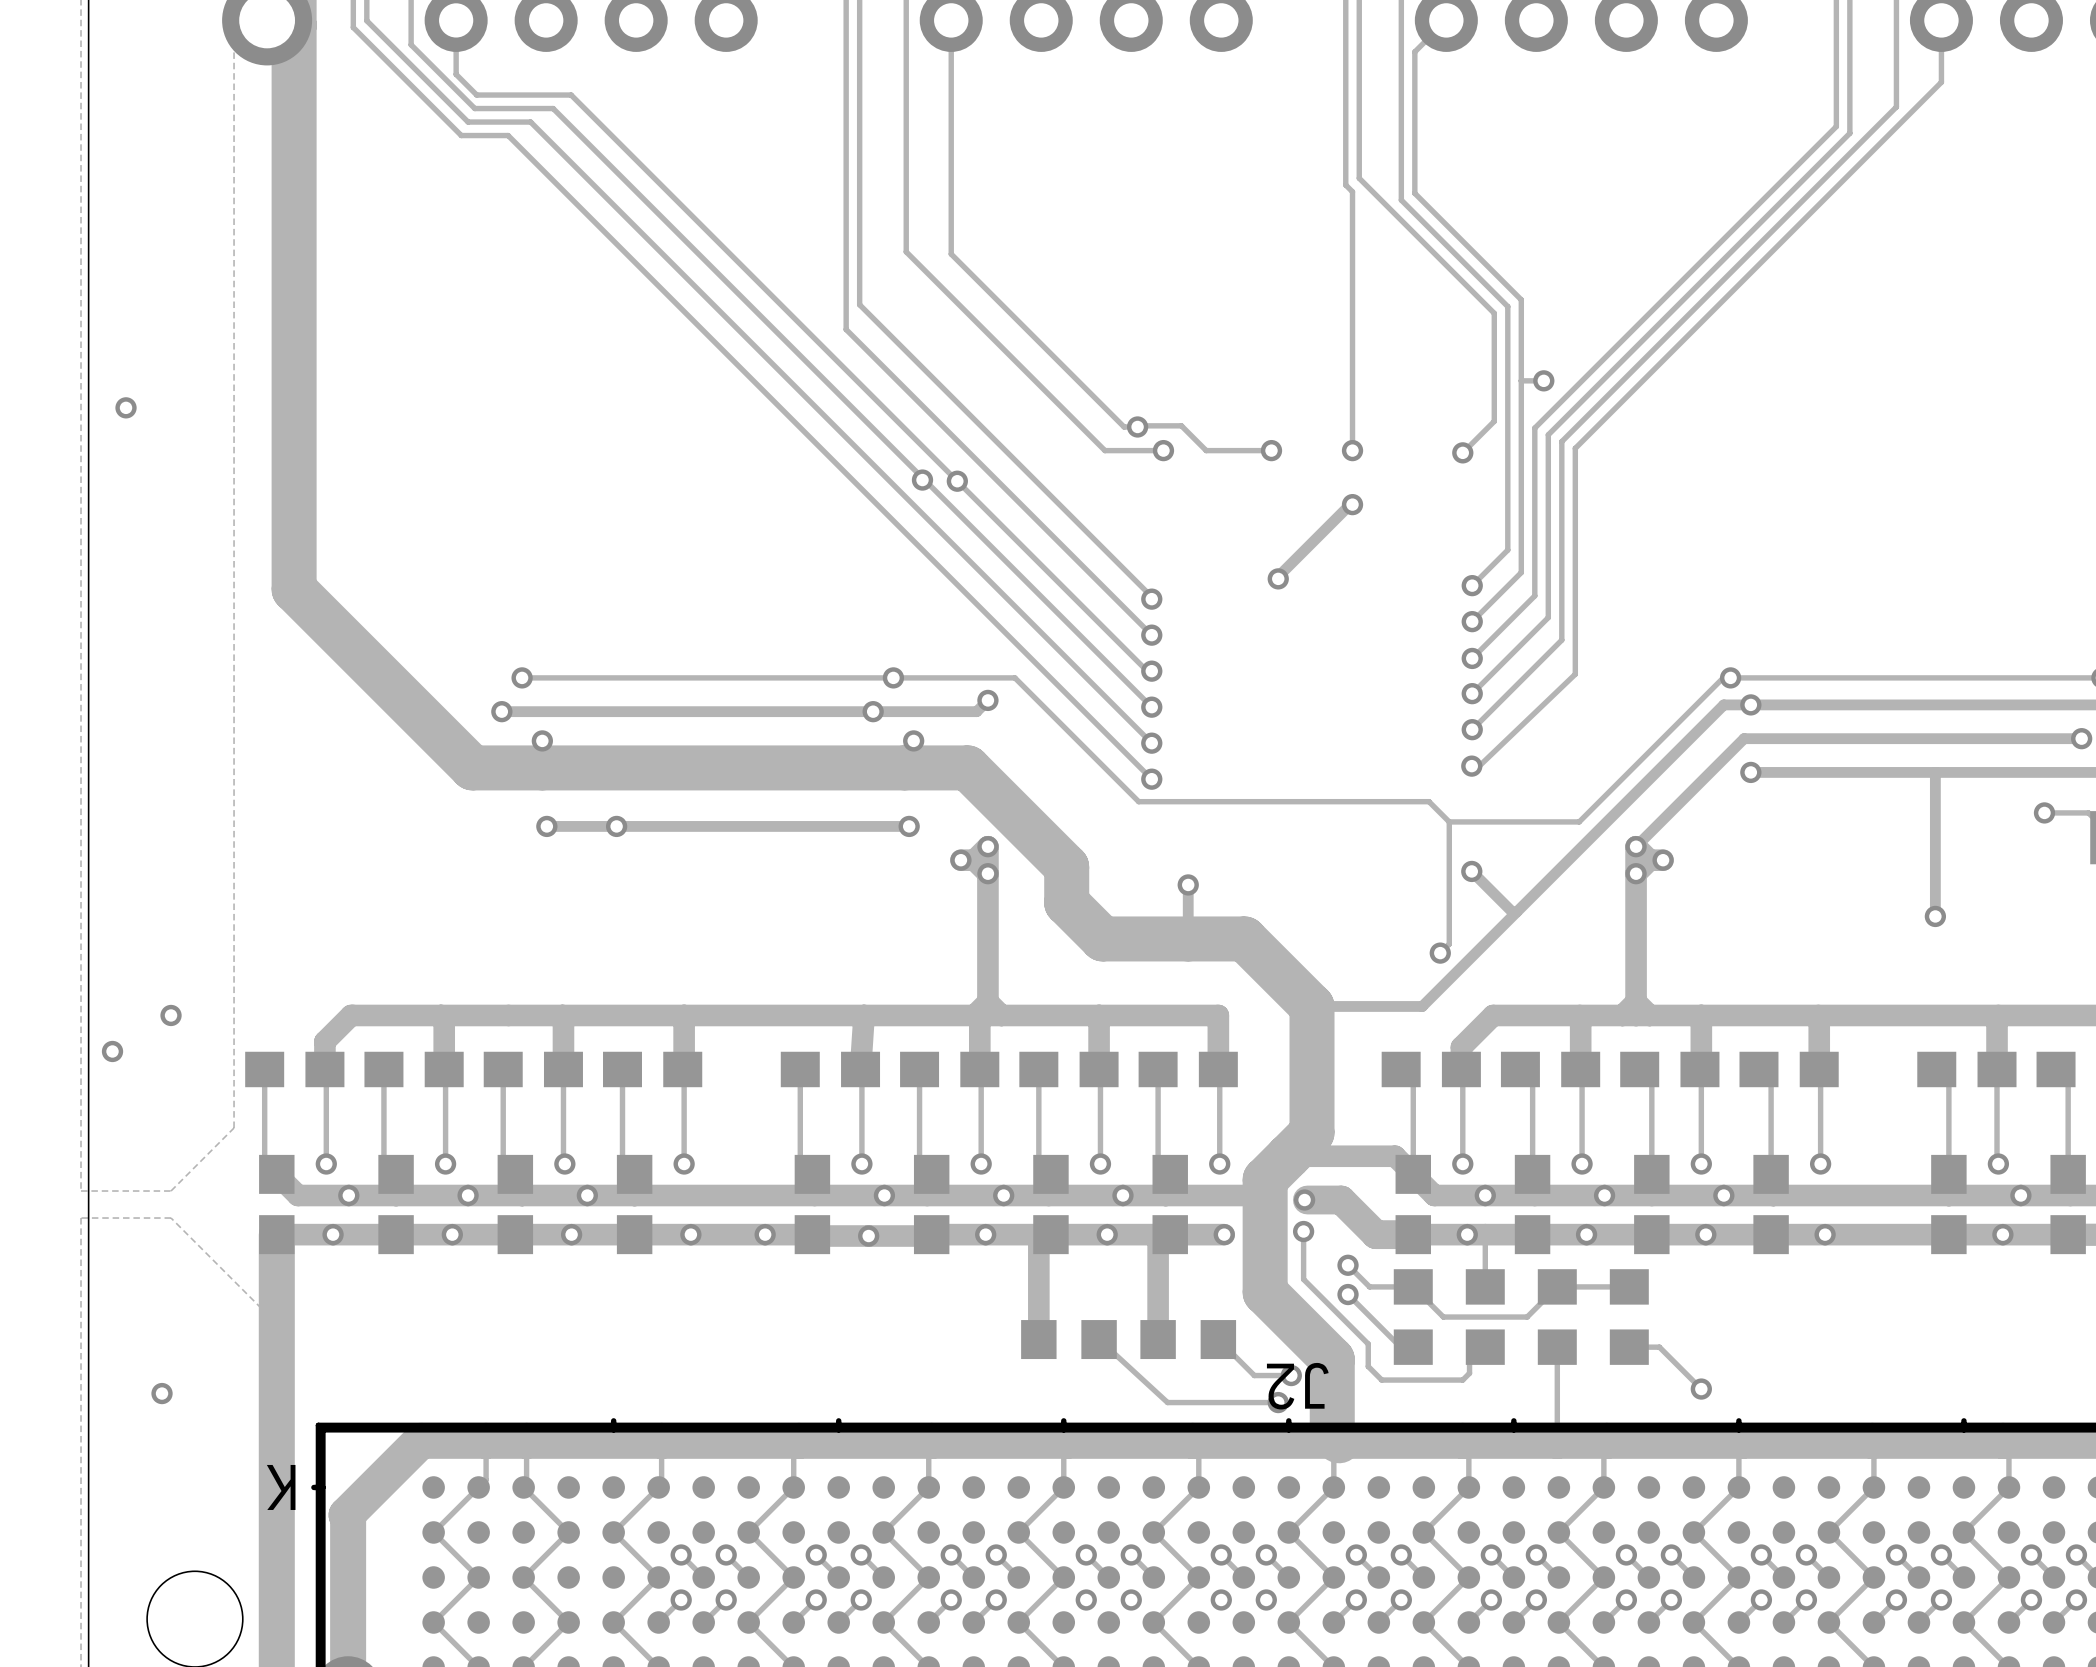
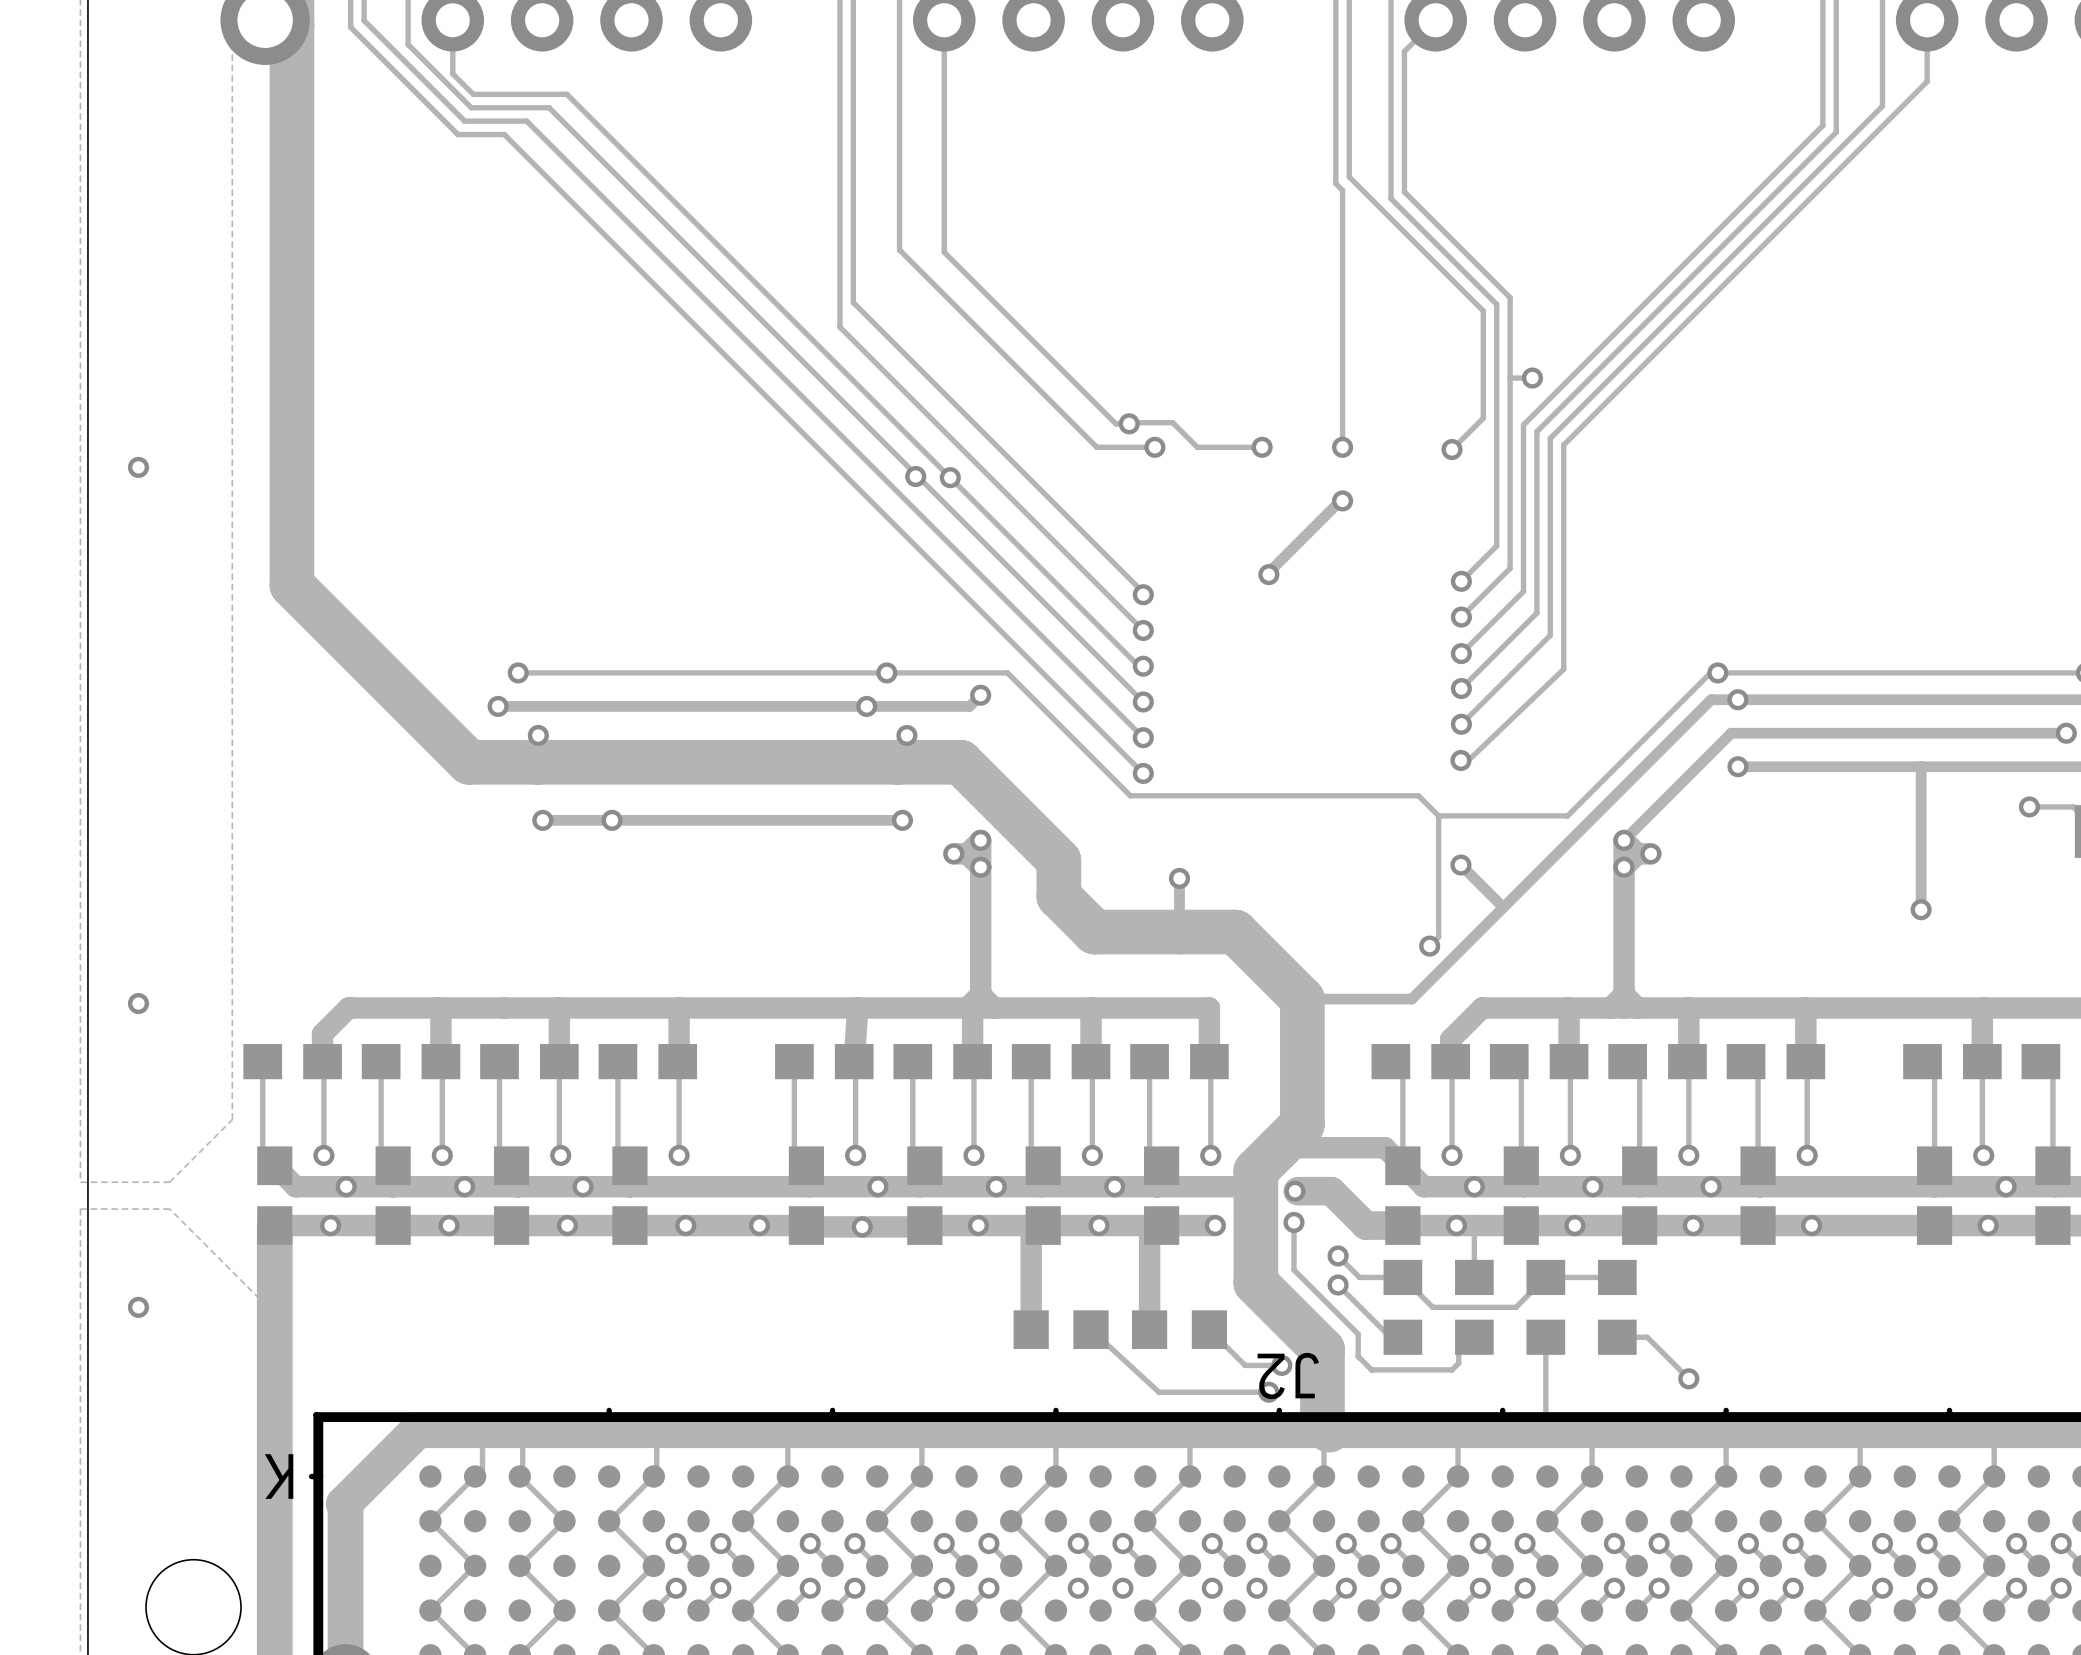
via position: (126, 407) -> (138, 467)
via: none -> (138, 1003)
via: (171, 1015) -> none
via: (112, 1051) -> none
via position: (162, 1393) -> (138, 1307)

